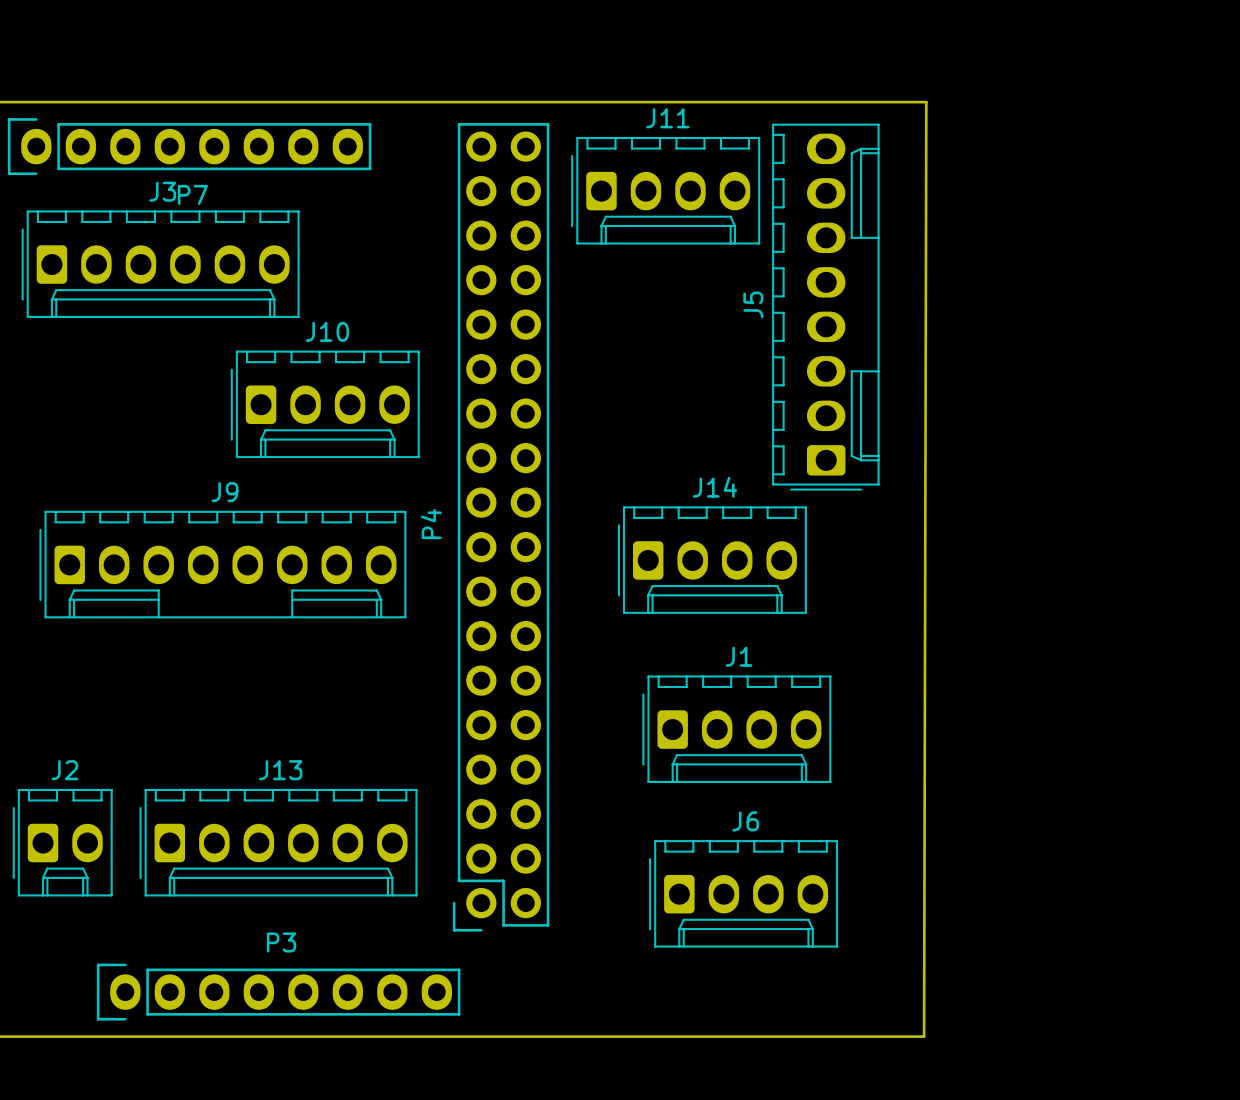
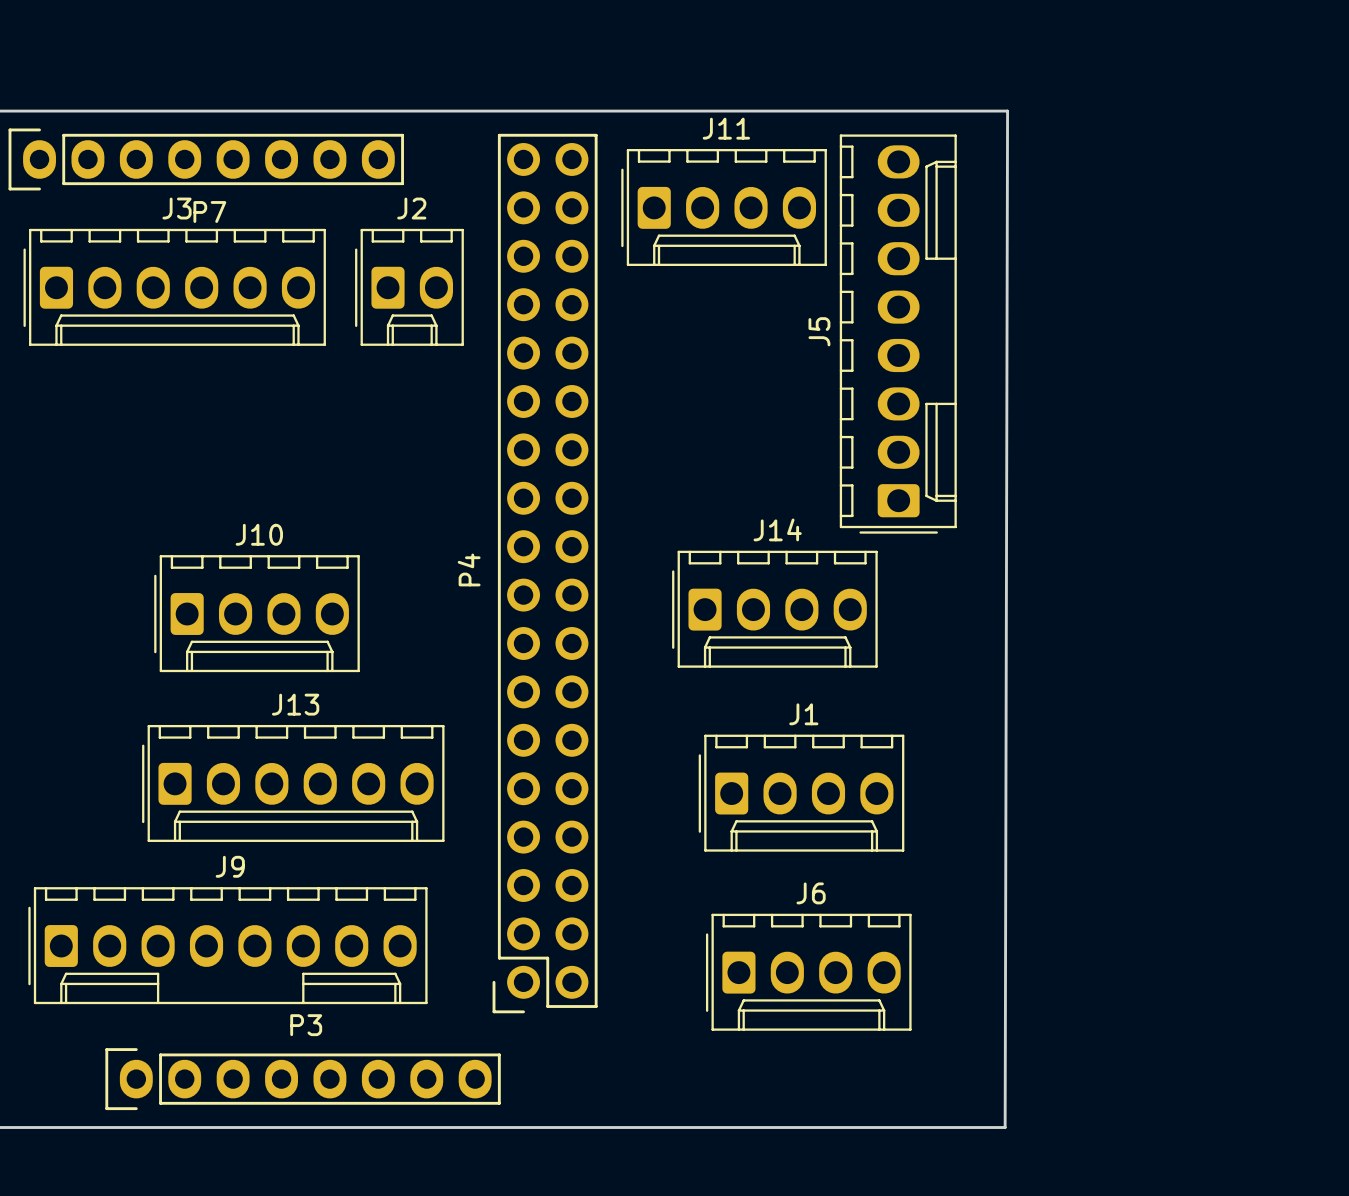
J10 position: (325, 404) -> (256, 613)
J9 position: (222, 564) -> (227, 945)
J2 position: (62, 842) -> (409, 287)
J13 position: (278, 842) -> (293, 783)

